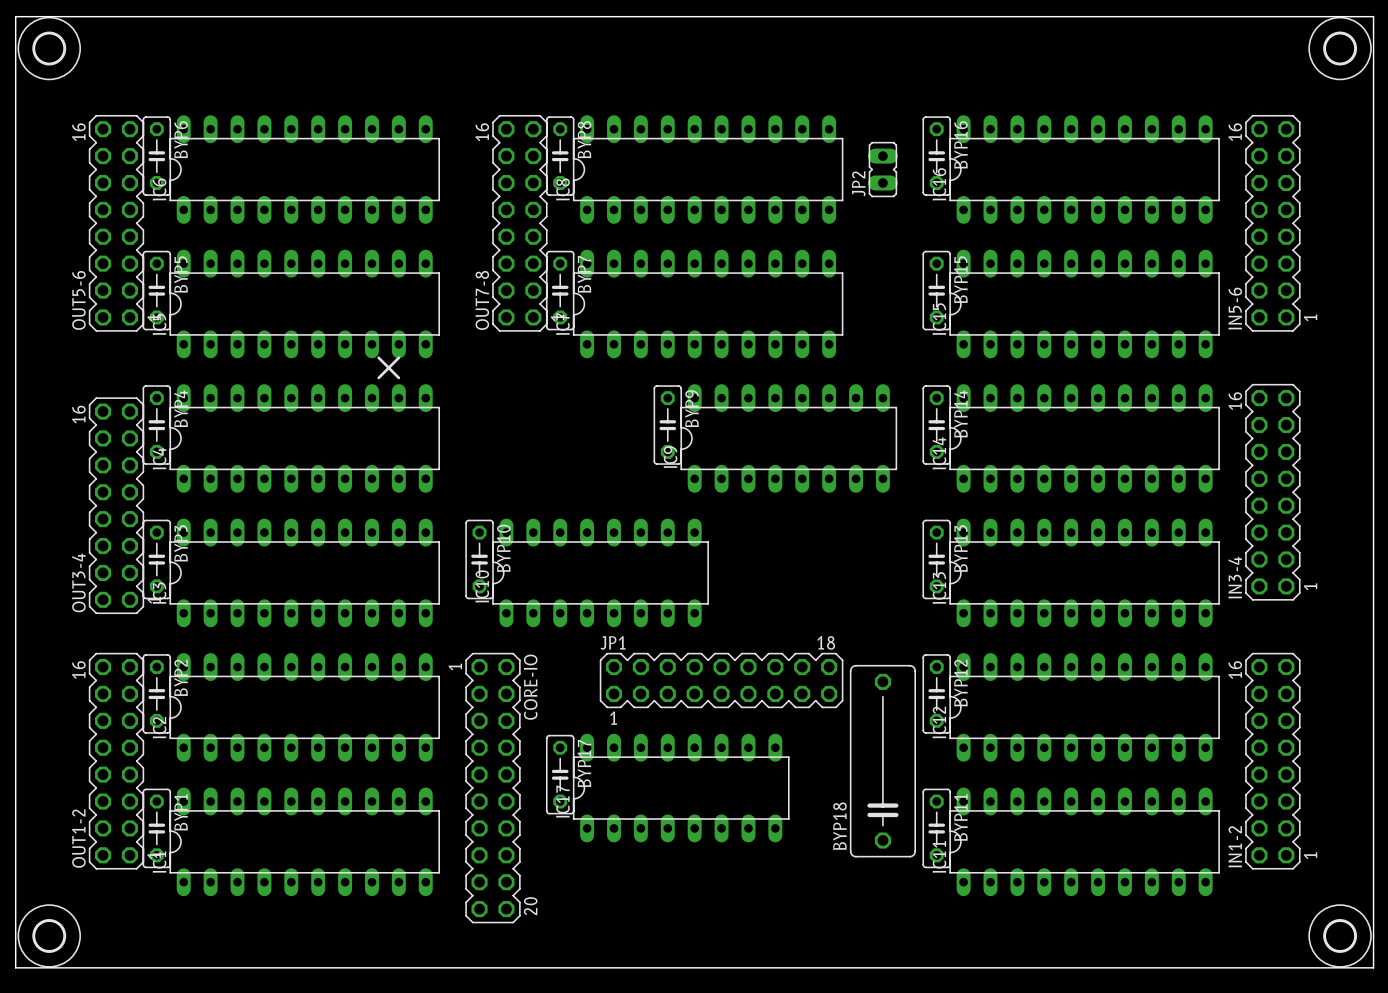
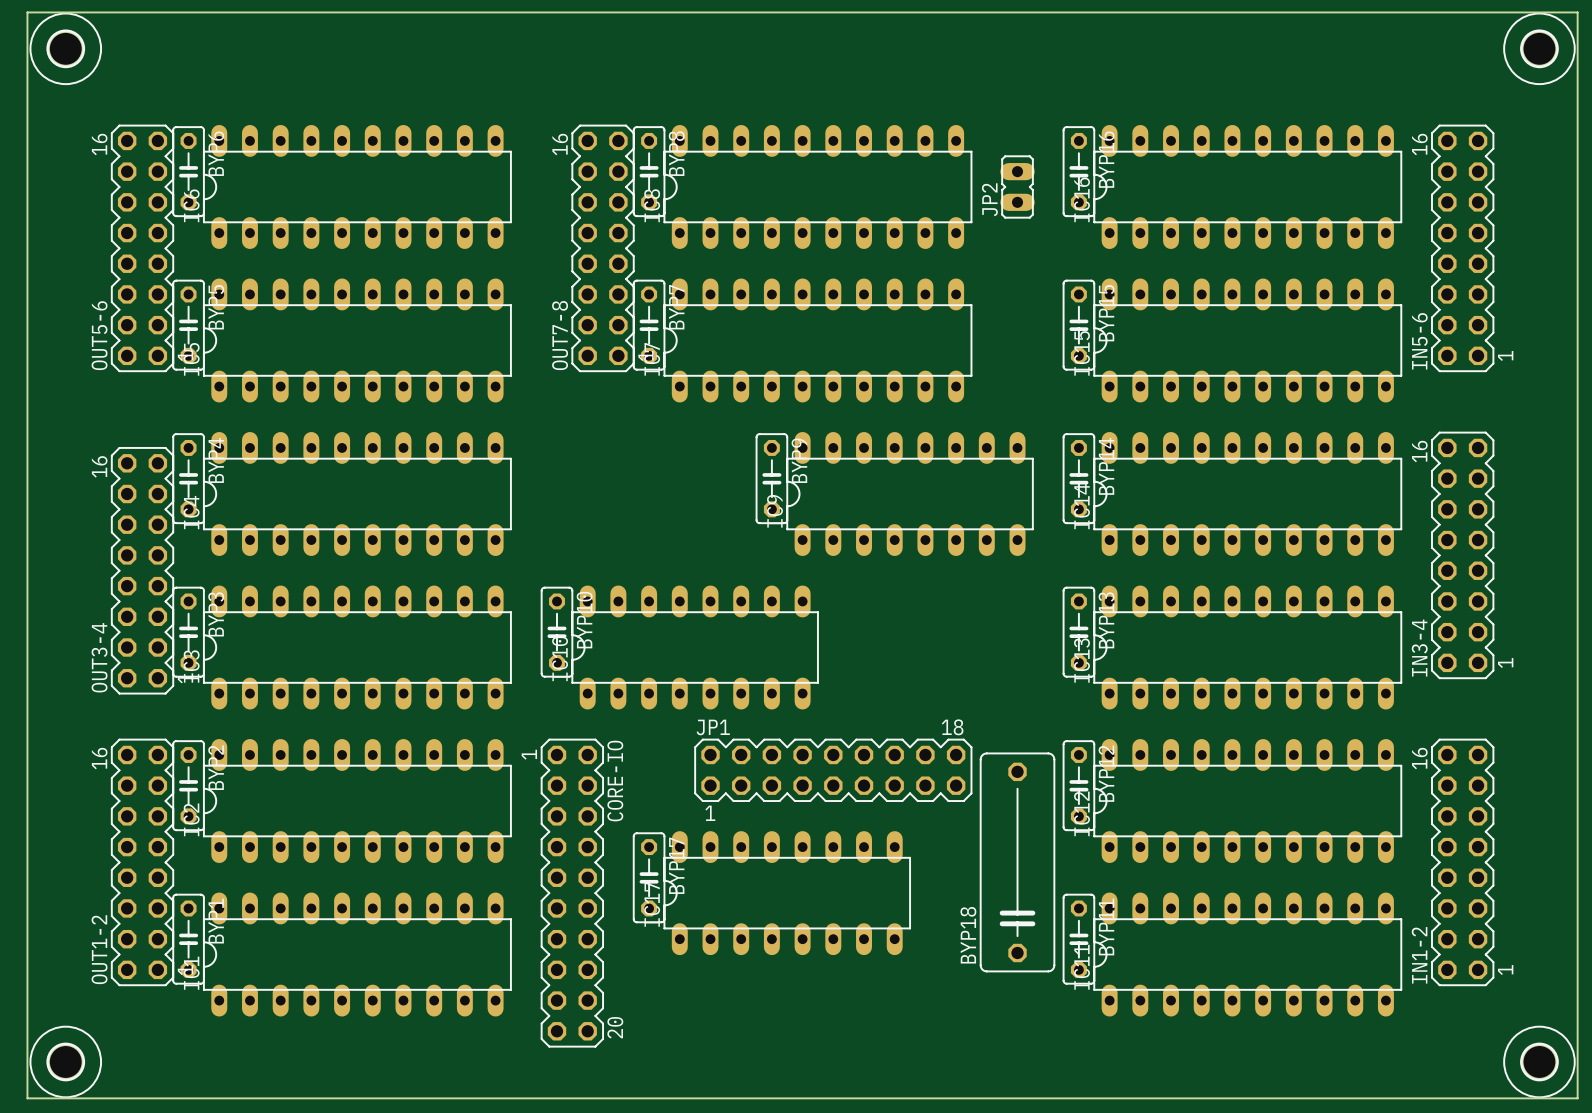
line: (378, 357) (398, 377) -> none
line: (398, 357) (378, 377) -> none

